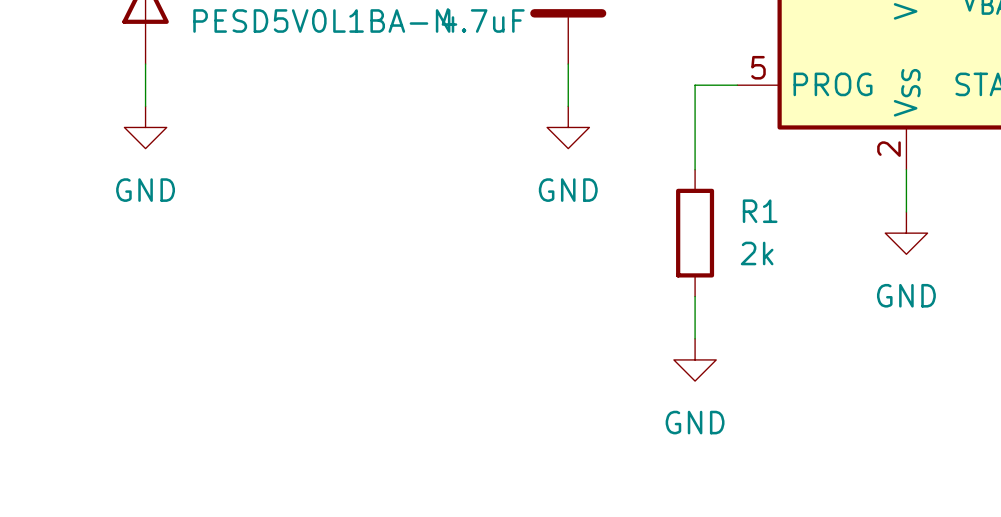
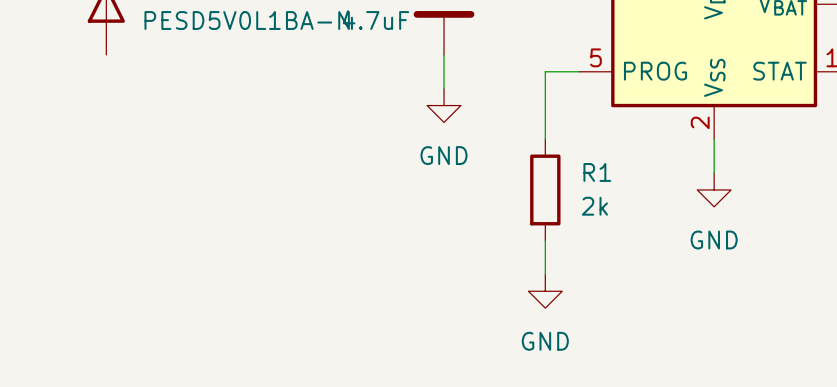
wire: (145, 64) (145, 106) -> none
power symbol: GND (145, 127) -> none

